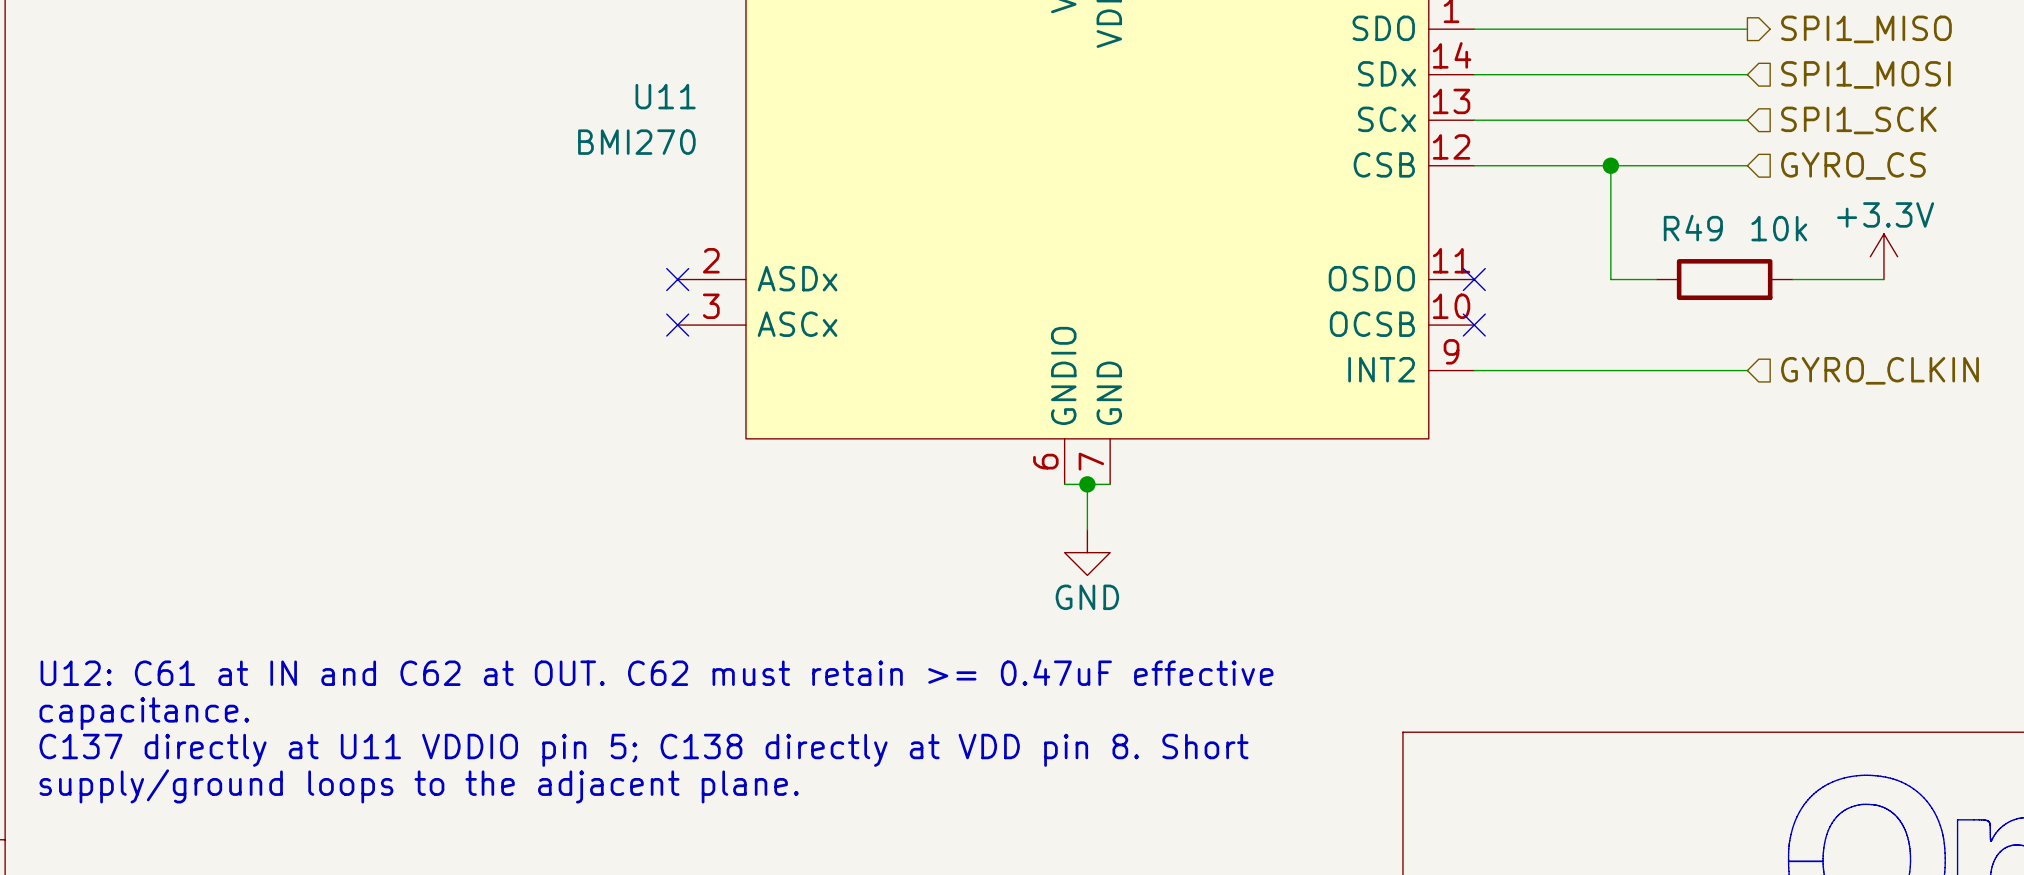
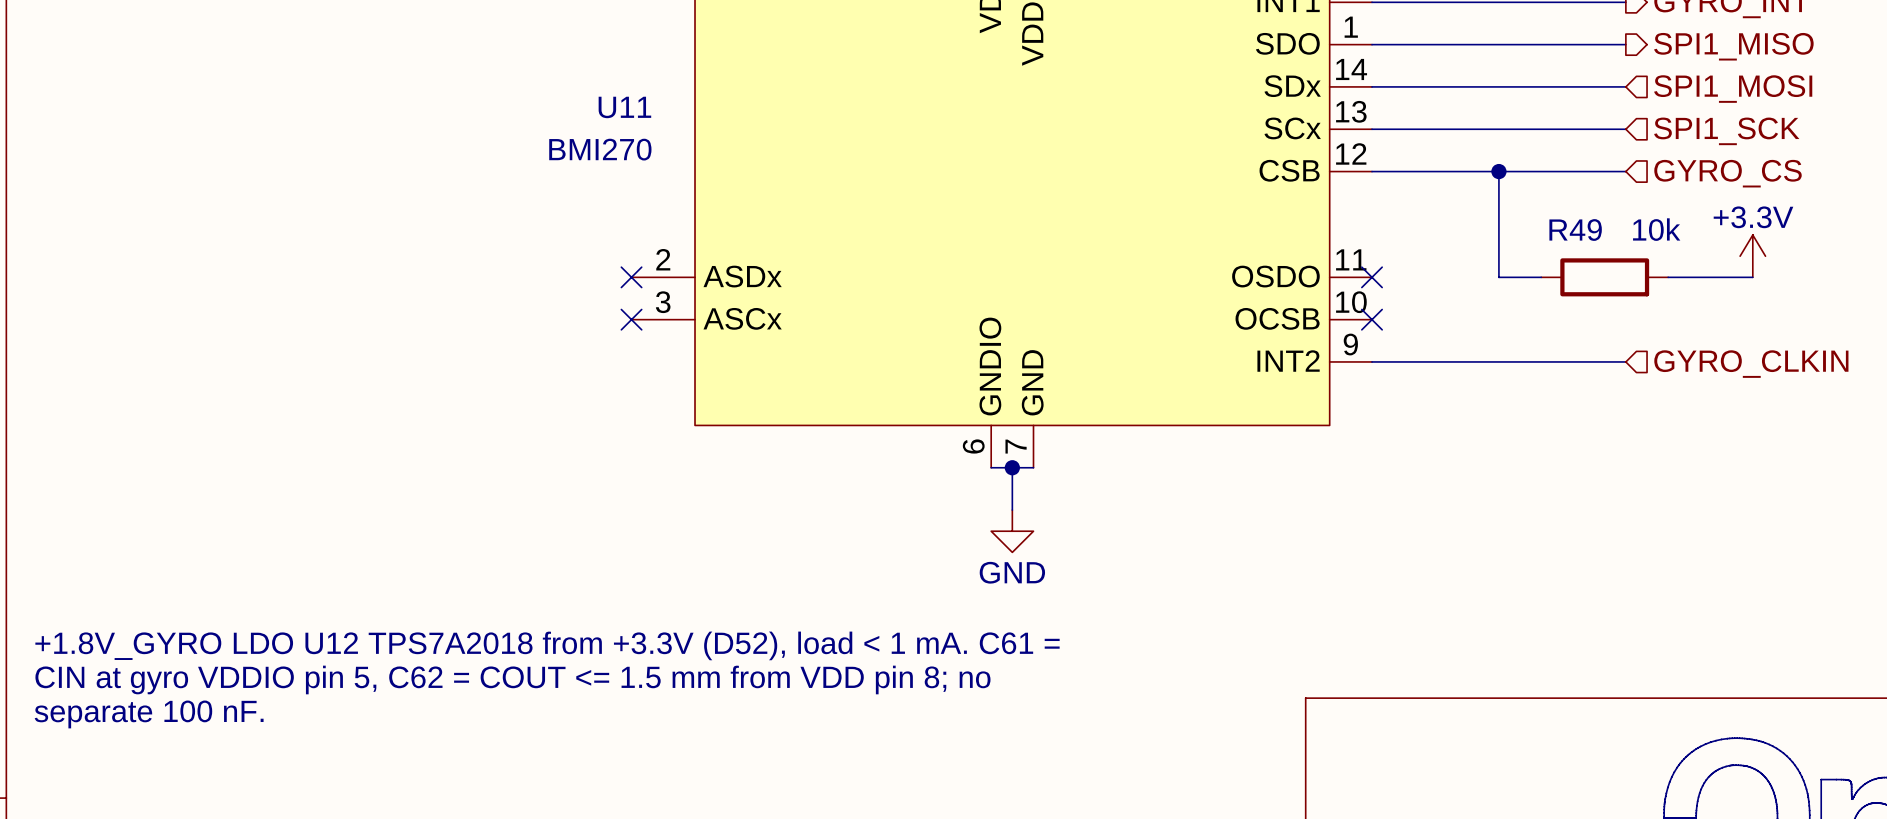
text: U12: C61 at IN and C62 at OUT. C62 must retain >= 0.47uF effective (657, 672) -> +1.8V_GYRO LDO U12 TPS7A2018 from +3.3V (D52), load < 1 mA. C61 = (547, 645)
text: capacitance. (144, 713) -> CIN at gyro VDDIO pin 5, C62 = COUT <= 1.5 mm from VDD pin 8; no (512, 679)
text: C137 directly at U11 VDDIO pin 5; C138 directly at VDD pin 8. Short (644, 750) -> separate 100 nF. (149, 714)
text: supply/ground loops to the adjacent plane. (419, 786) -> none

